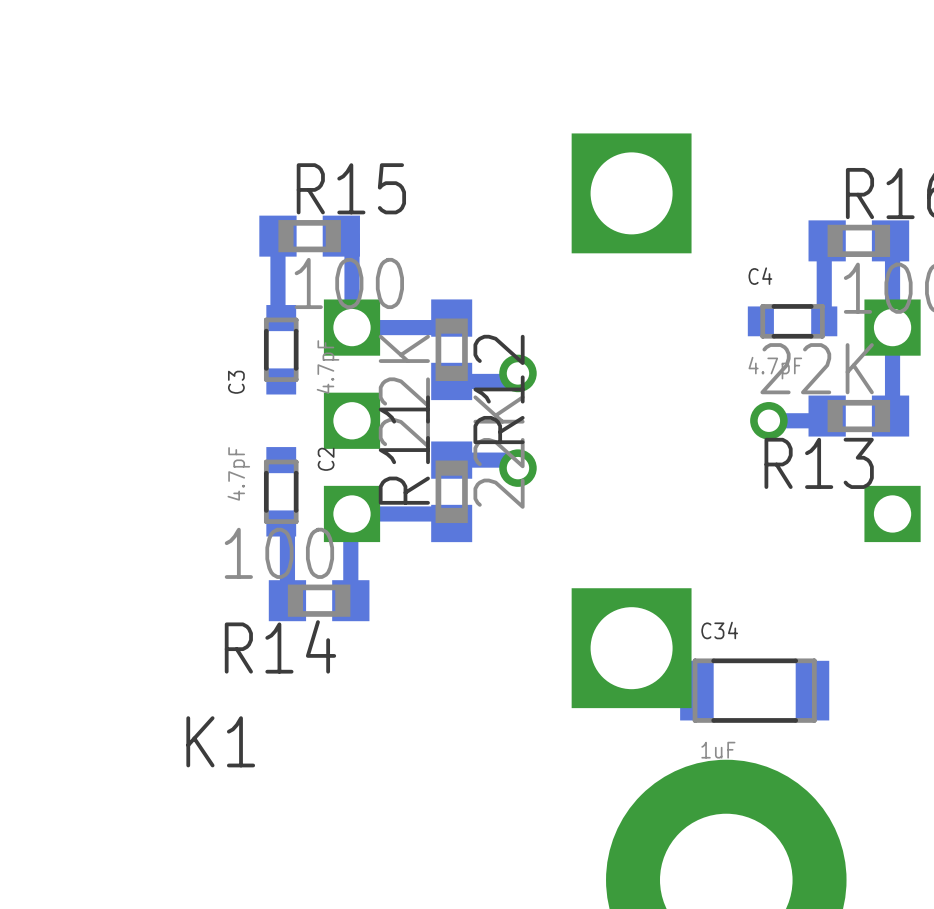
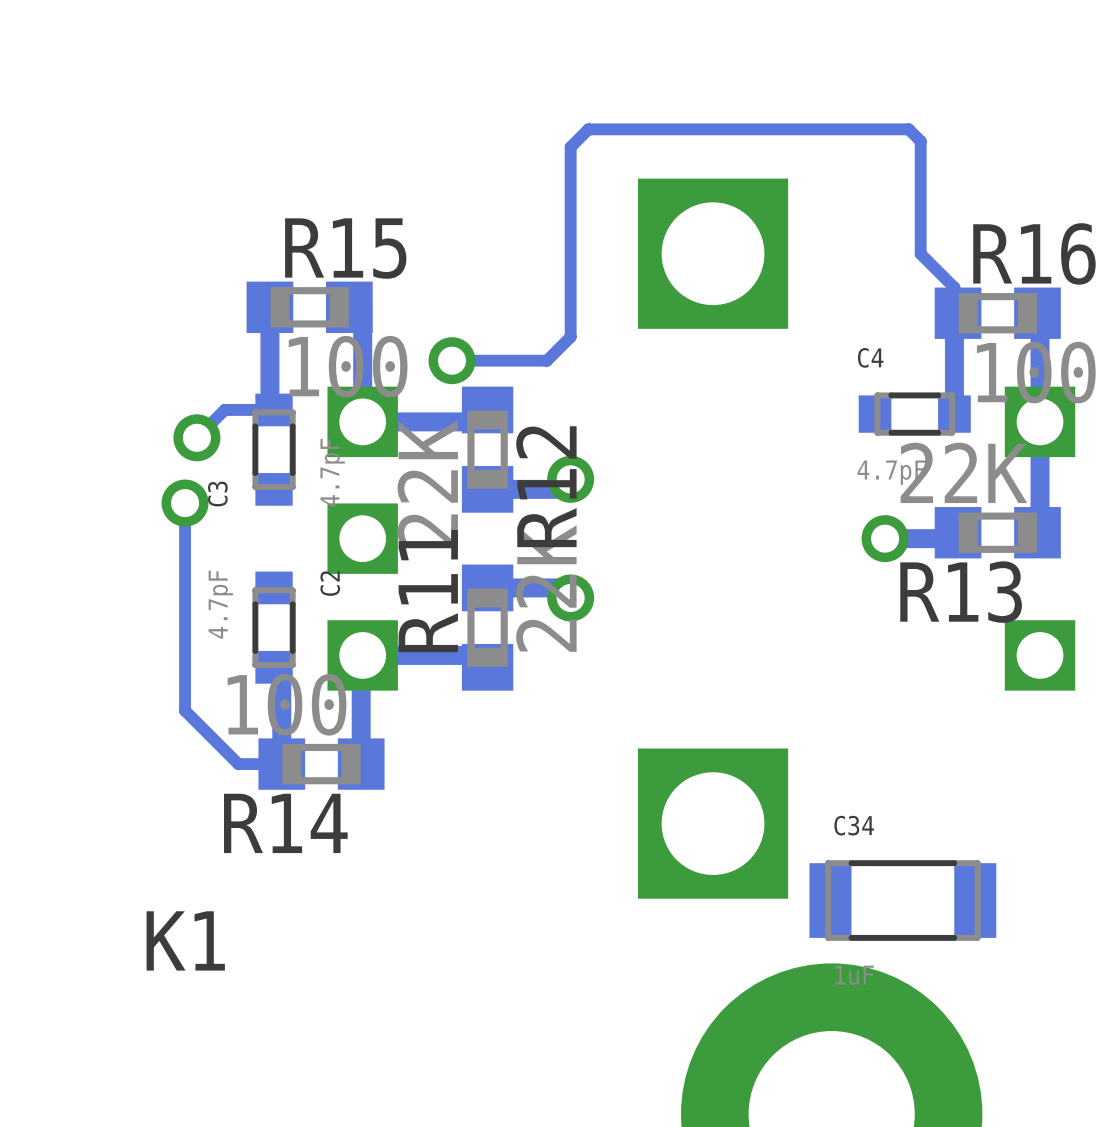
track: none -> (452, 360) (546, 360) (570, 336) (570, 147) (588, 129) (908, 129) (920, 141) (920, 253) (954, 287) (954, 414)
via: none -> (452, 360)
track: none -> (269, 409) (224, 409) (196, 437)
via: none -> (196, 437)
track: none -> (185, 503) (185, 710) (238, 764) (281, 764)
via: none -> (185, 503)
C34 position: (754, 690) -> (902, 900)

